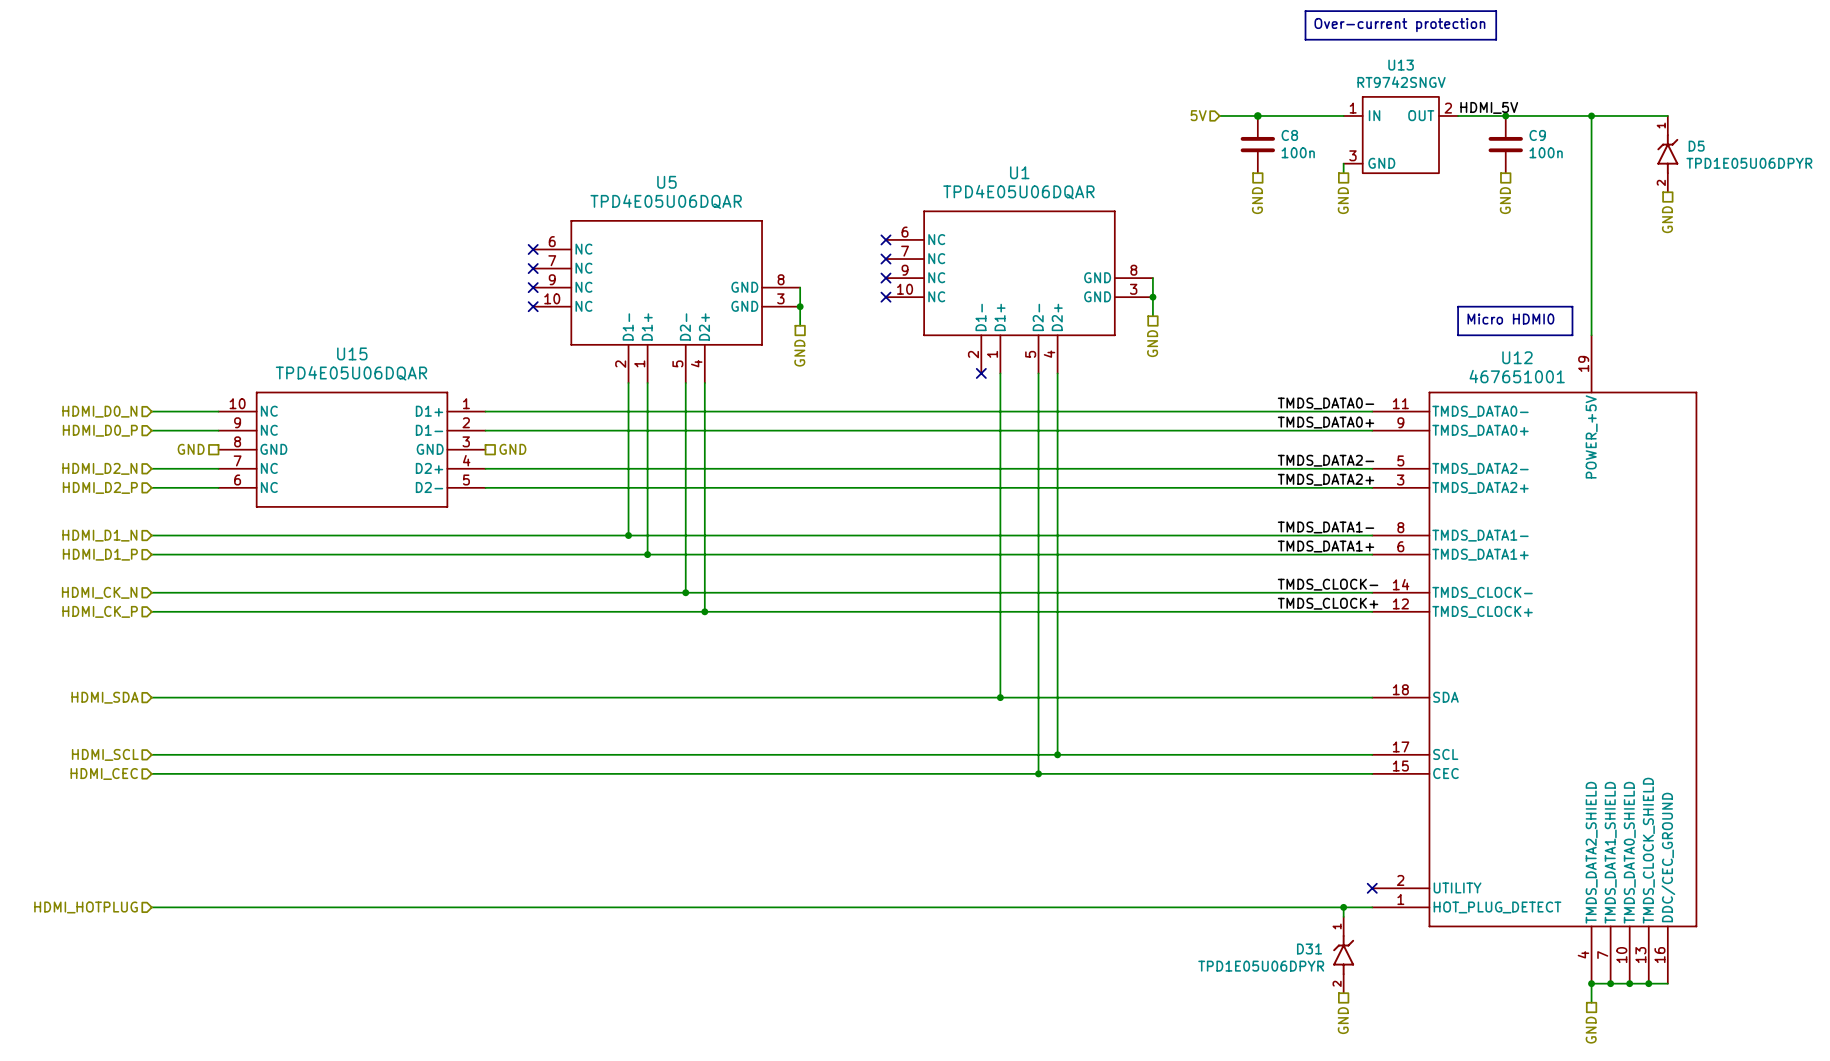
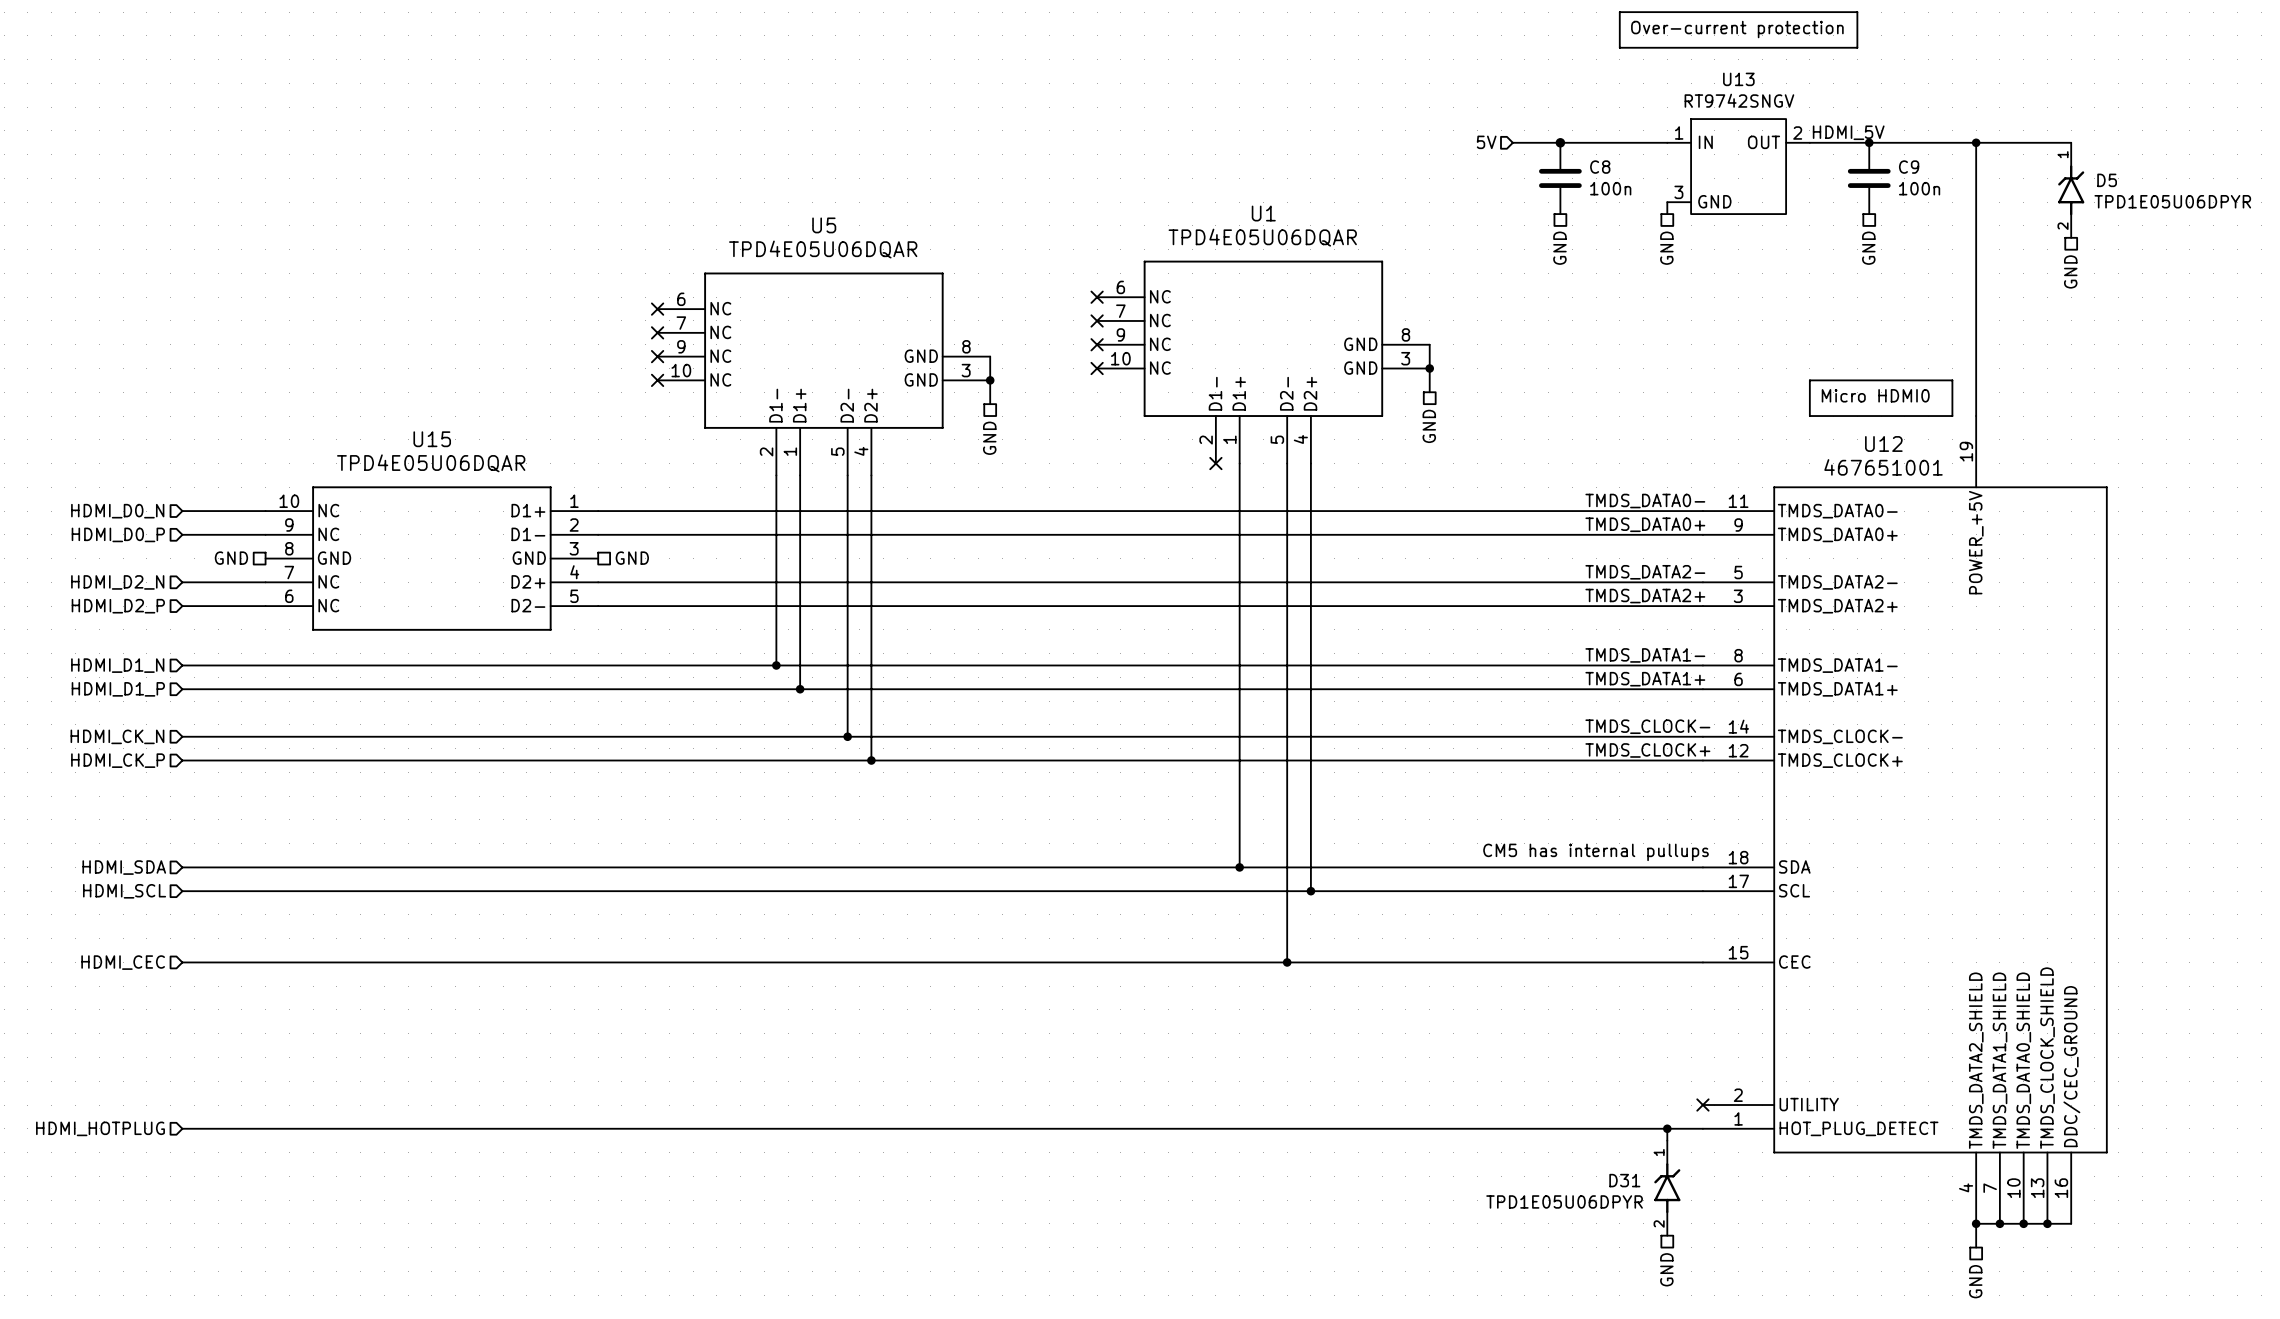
U12 symbol: [1372, 335, 1697, 984] -> [1702, 416, 2108, 1224]
text: none -> CM5 has internal pullups (1596, 852)
wire: (1057, 716) (1057, 754) -> none
hierarchical label position: HDMI_SCL (105, 754) -> HDMI_SCL (124, 891)
wire: (151, 754) (1372, 754) -> (182, 891) (1702, 891)
junction position: (1057, 754) -> (1310, 891)

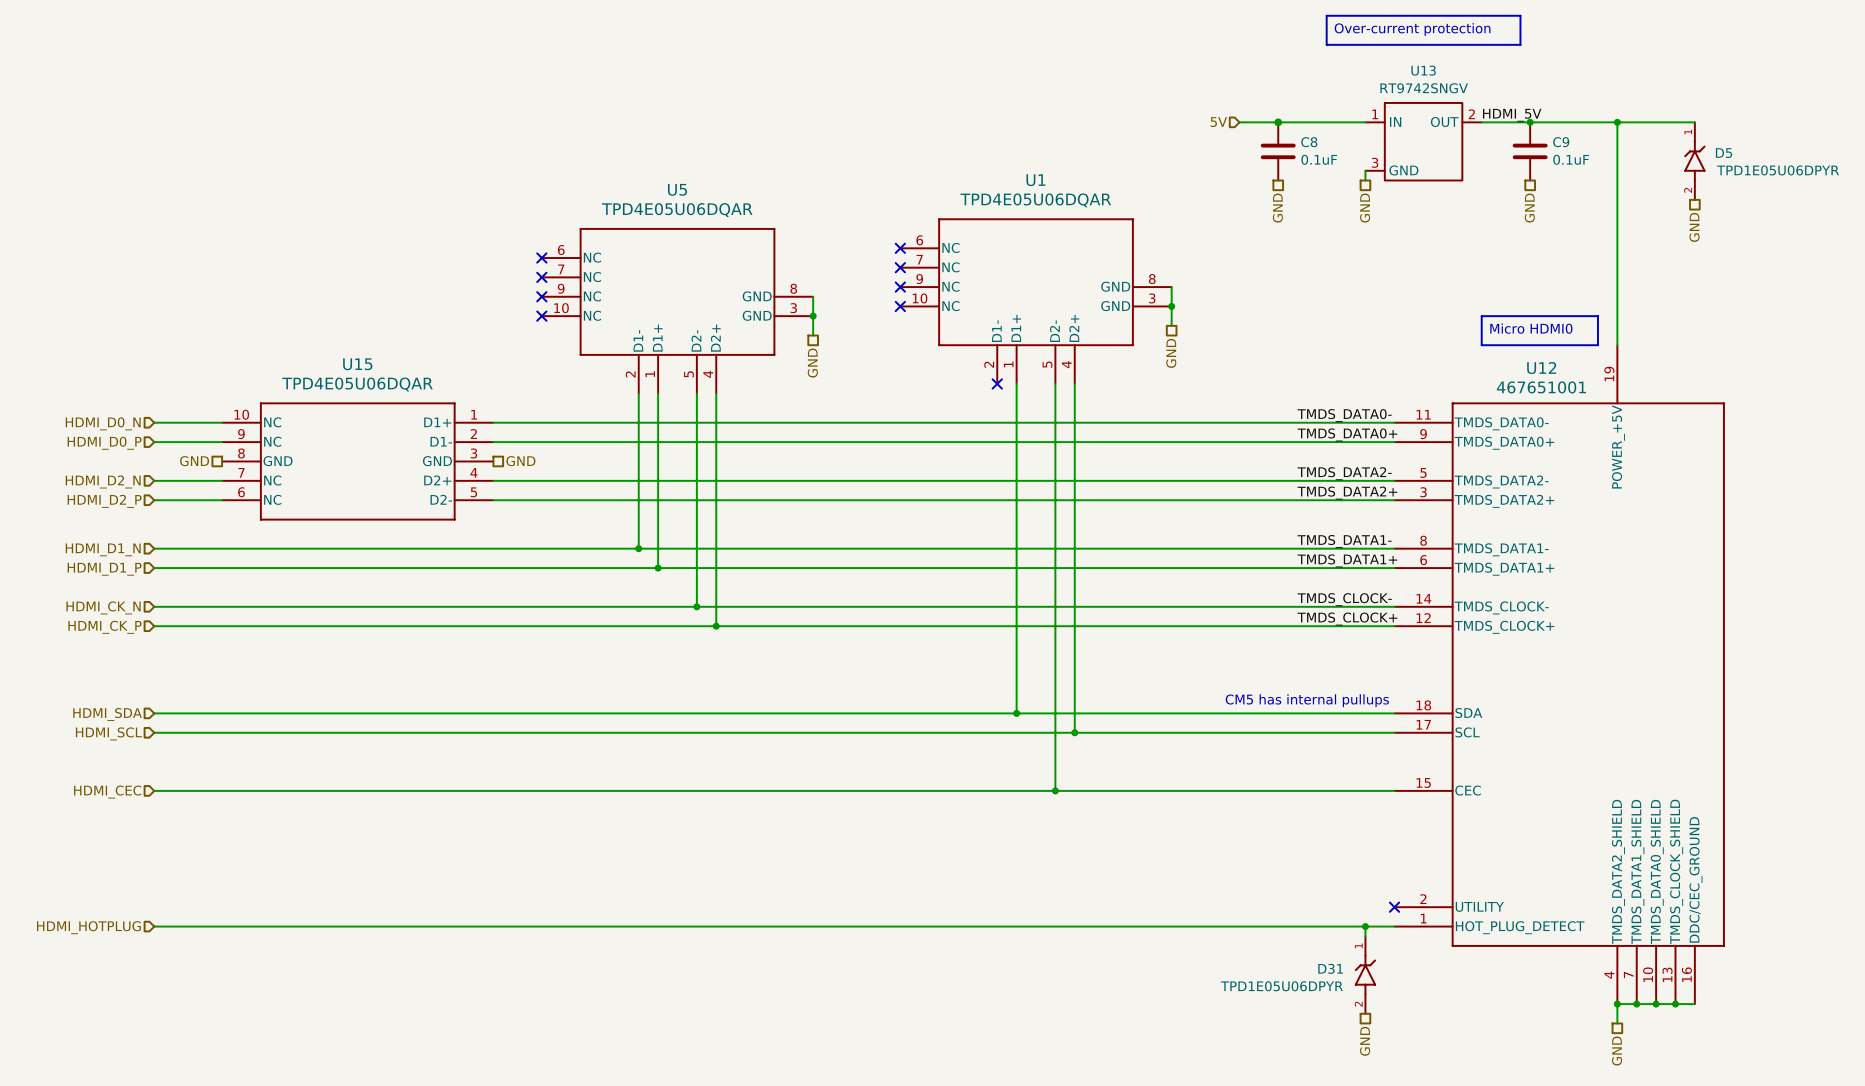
C8 value: 100n (1610, 188) -> 0.1uF (1319, 159)
C9 value: 100n (1919, 188) -> 0.1uF (1571, 159)

